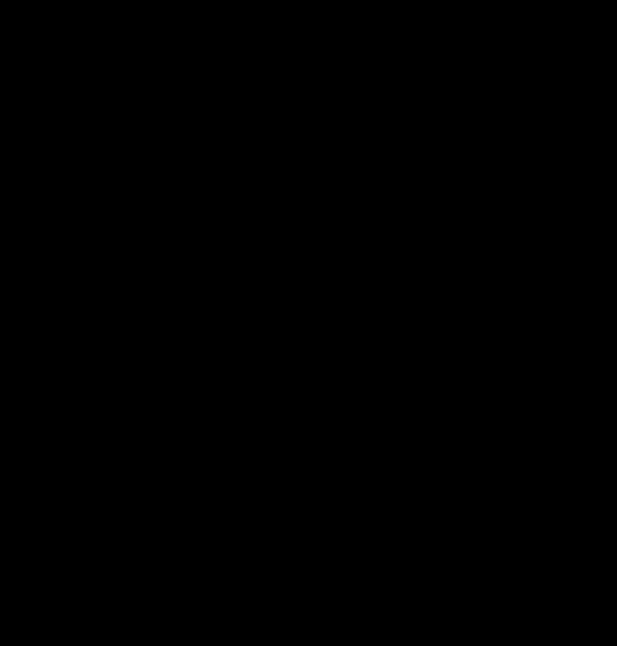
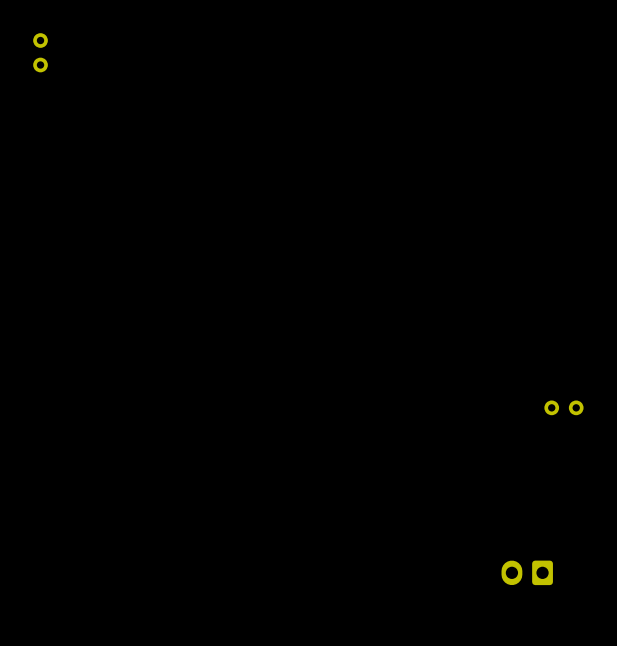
part: none -> (40, 52)
part: none -> (563, 407)
part: none -> (527, 572)

